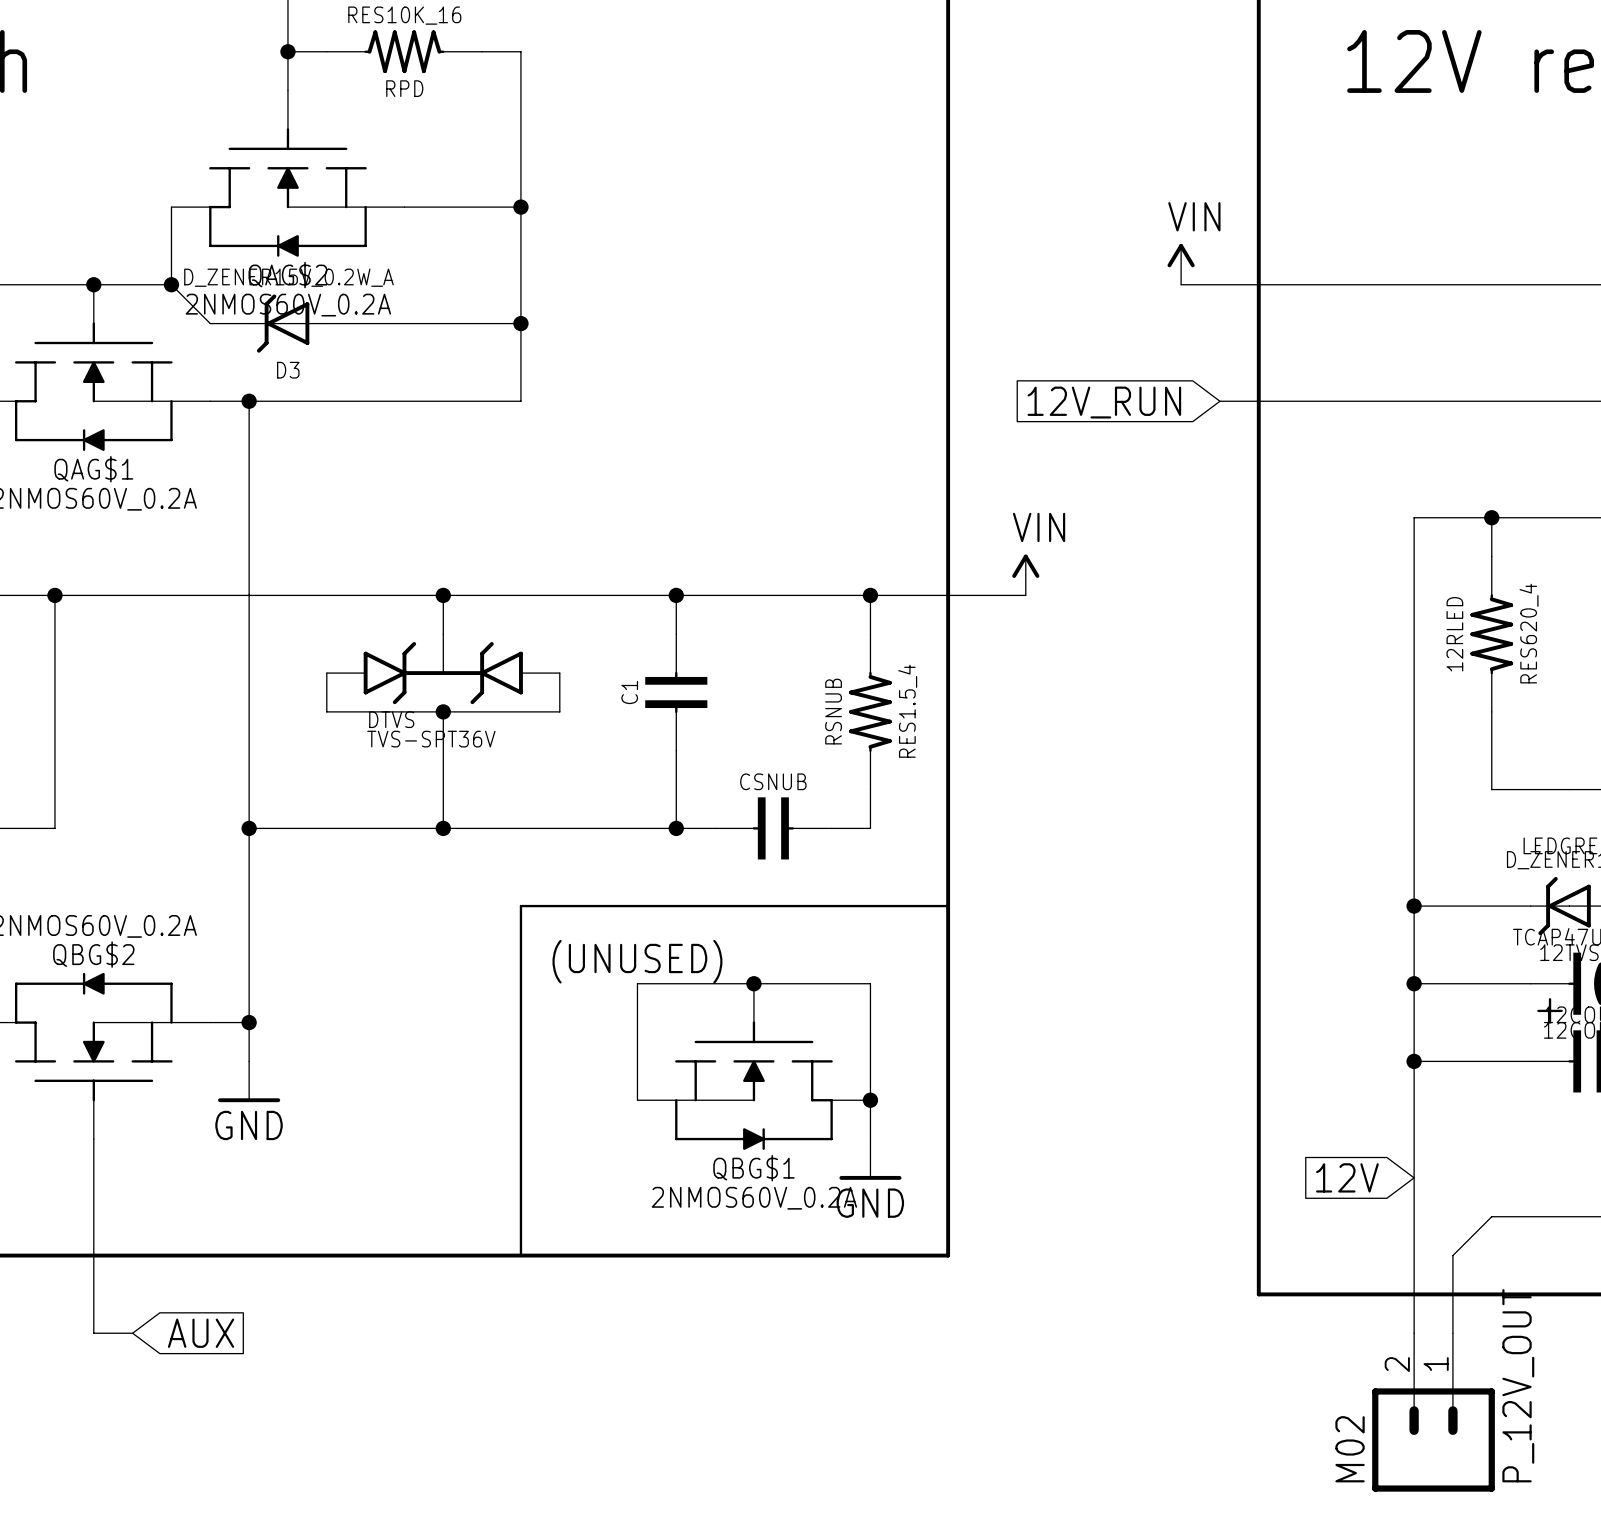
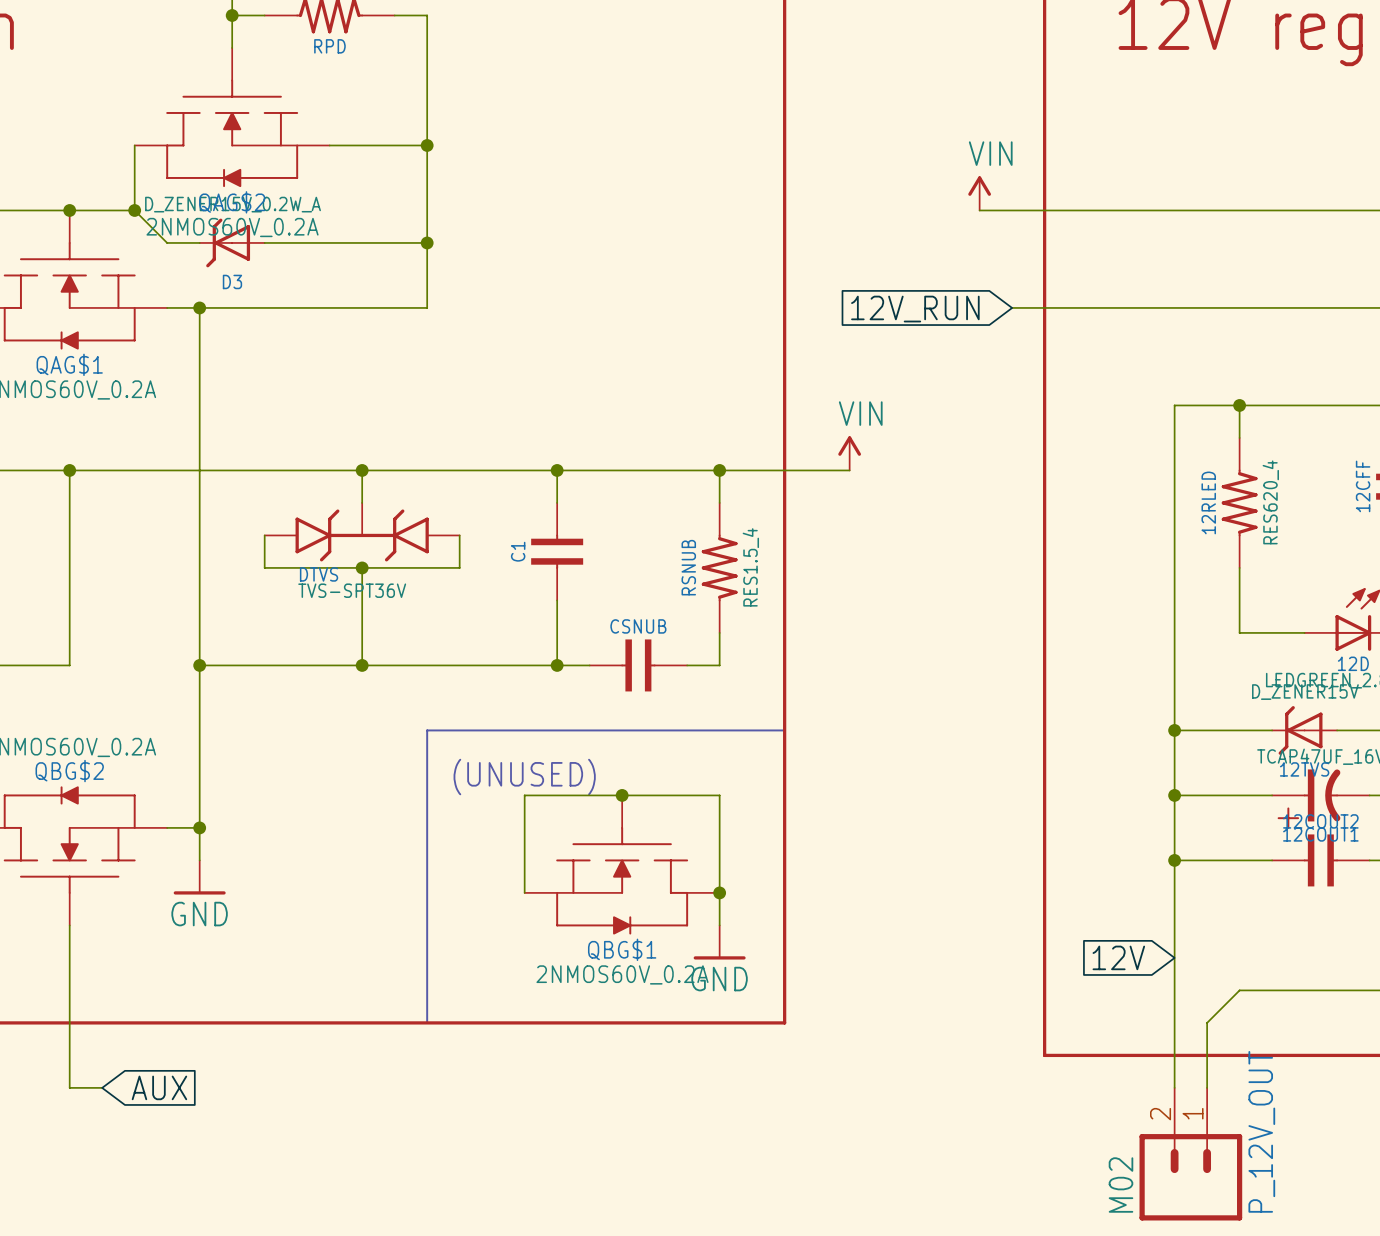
wire: (54, 595) (54, 828) -> (69, 470) (69, 665) (37, 665)
junction position: (54, 595) -> (69, 470)

